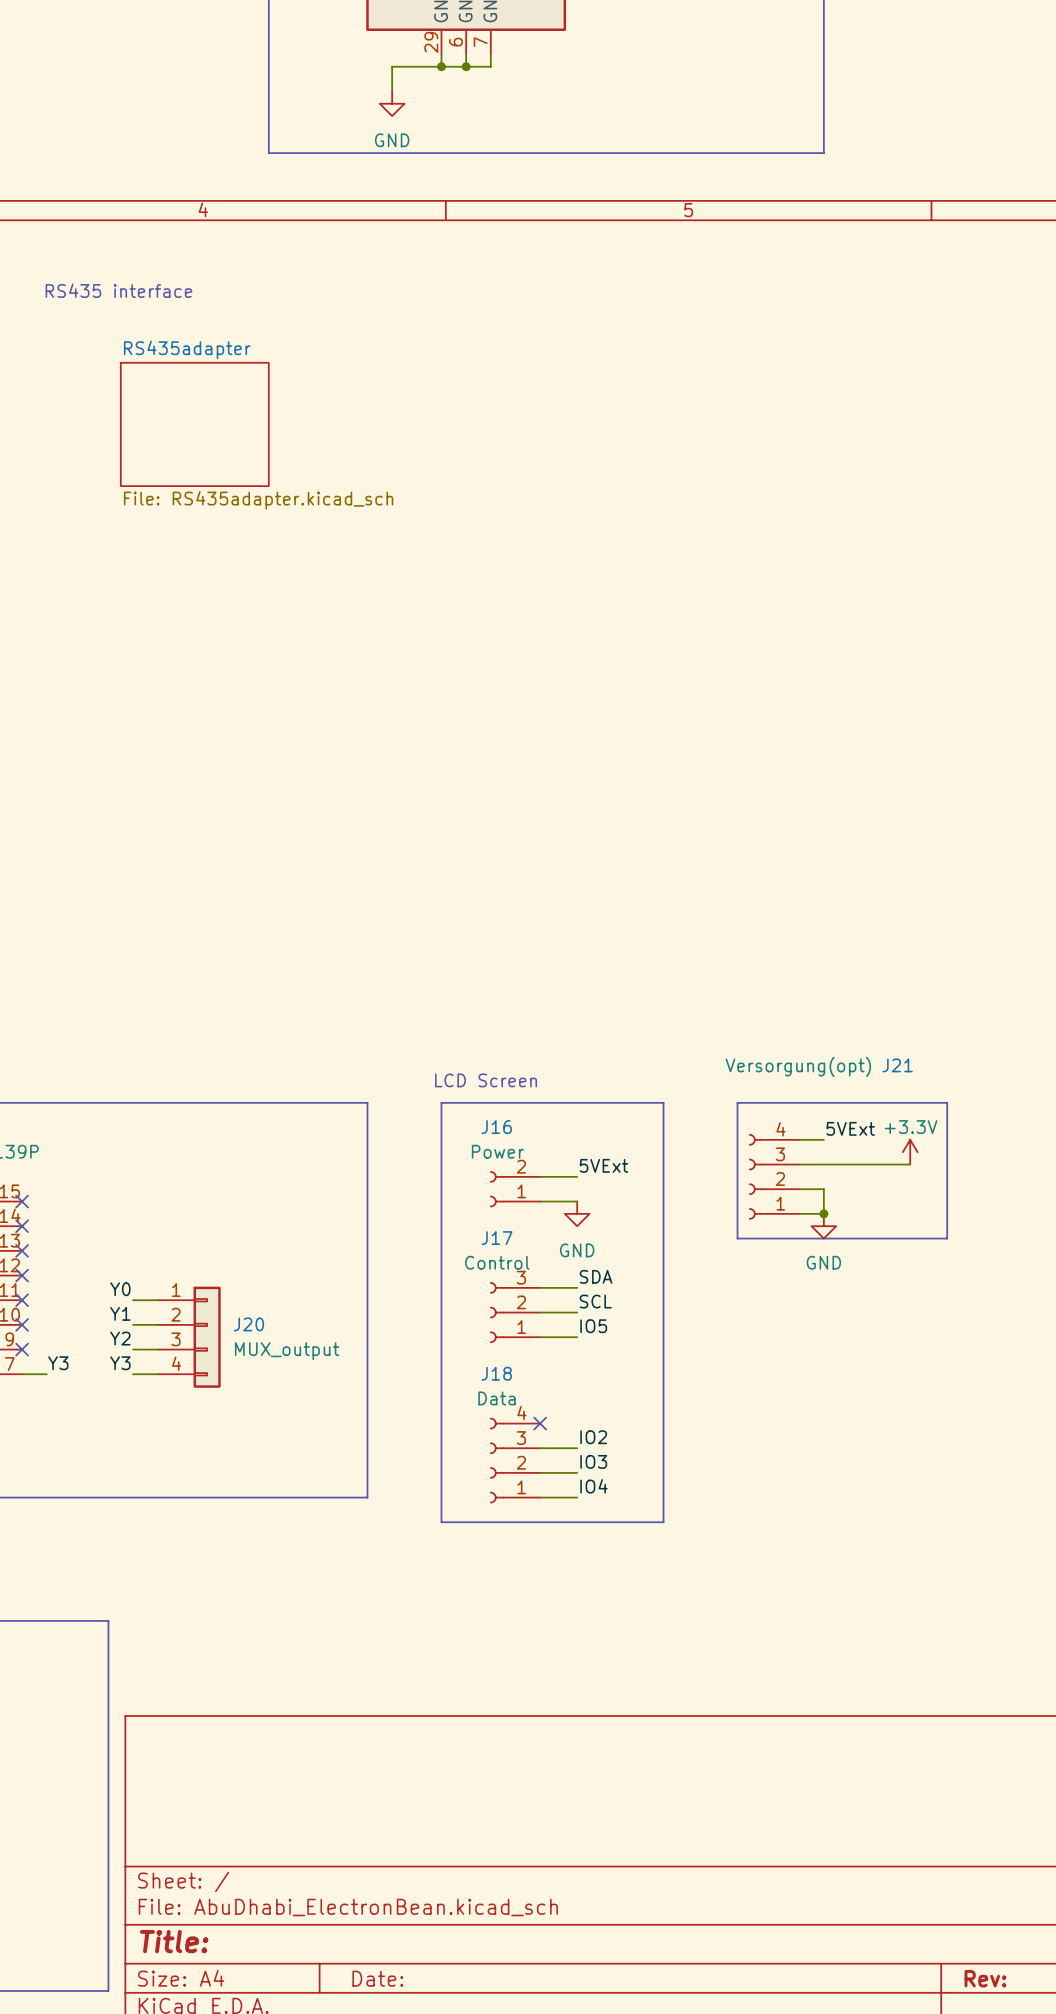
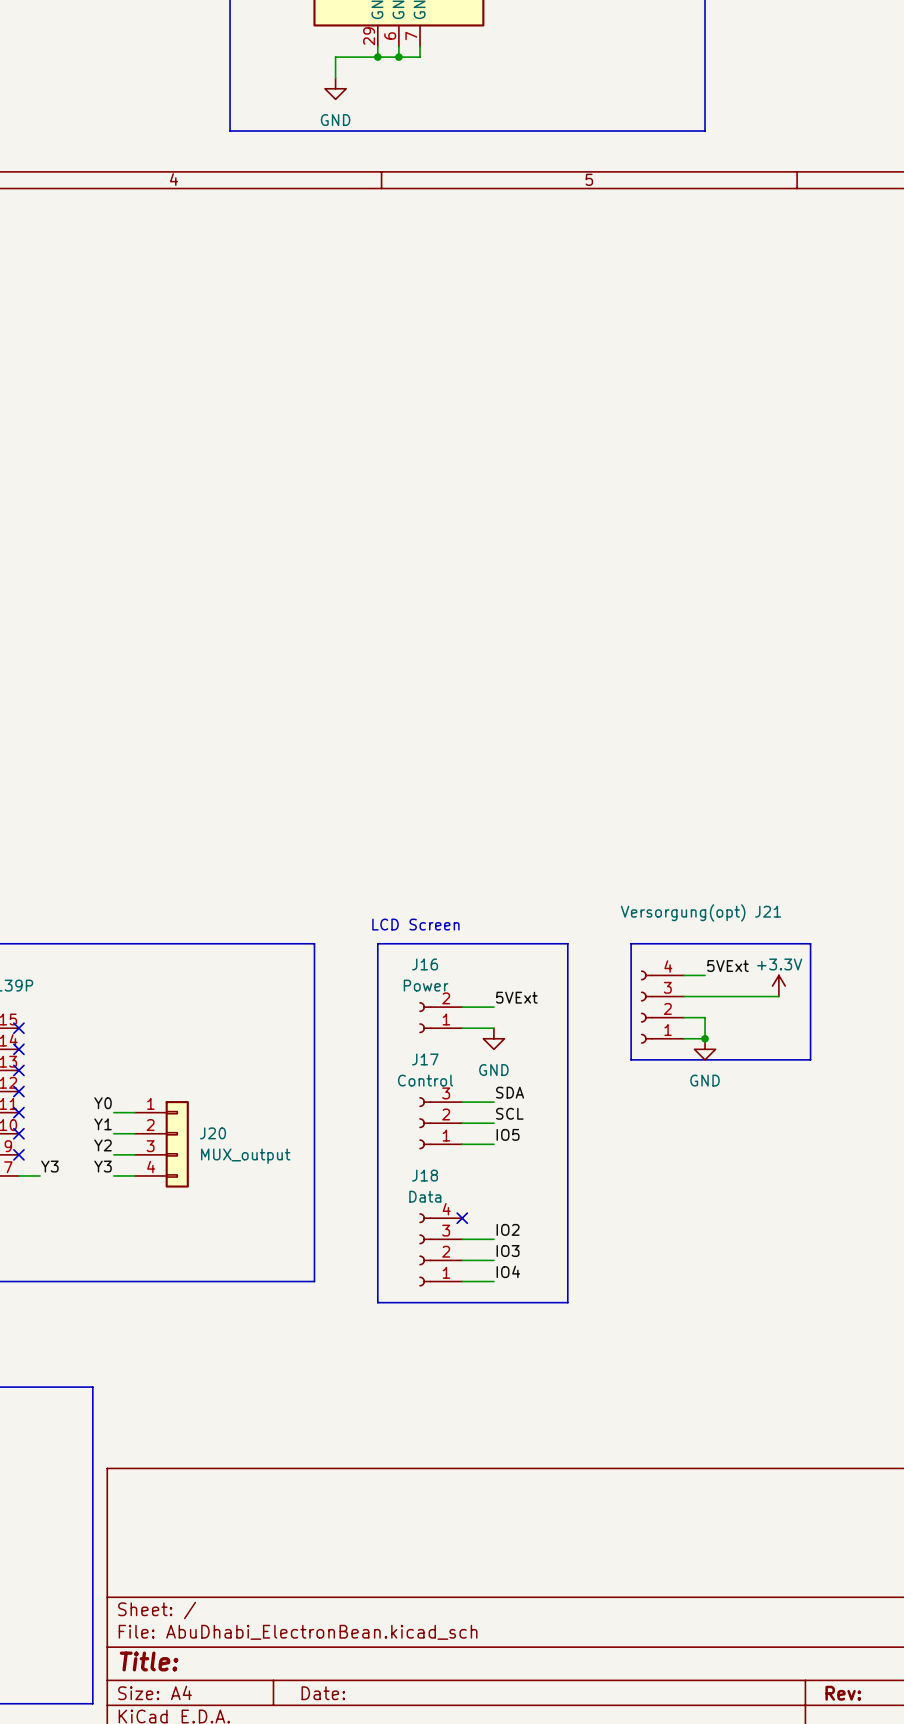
text: RS435 interface (118, 290) -> none
sheet RS435adapter: File: RS435adapter.kicad_sch (194, 424) -> none

